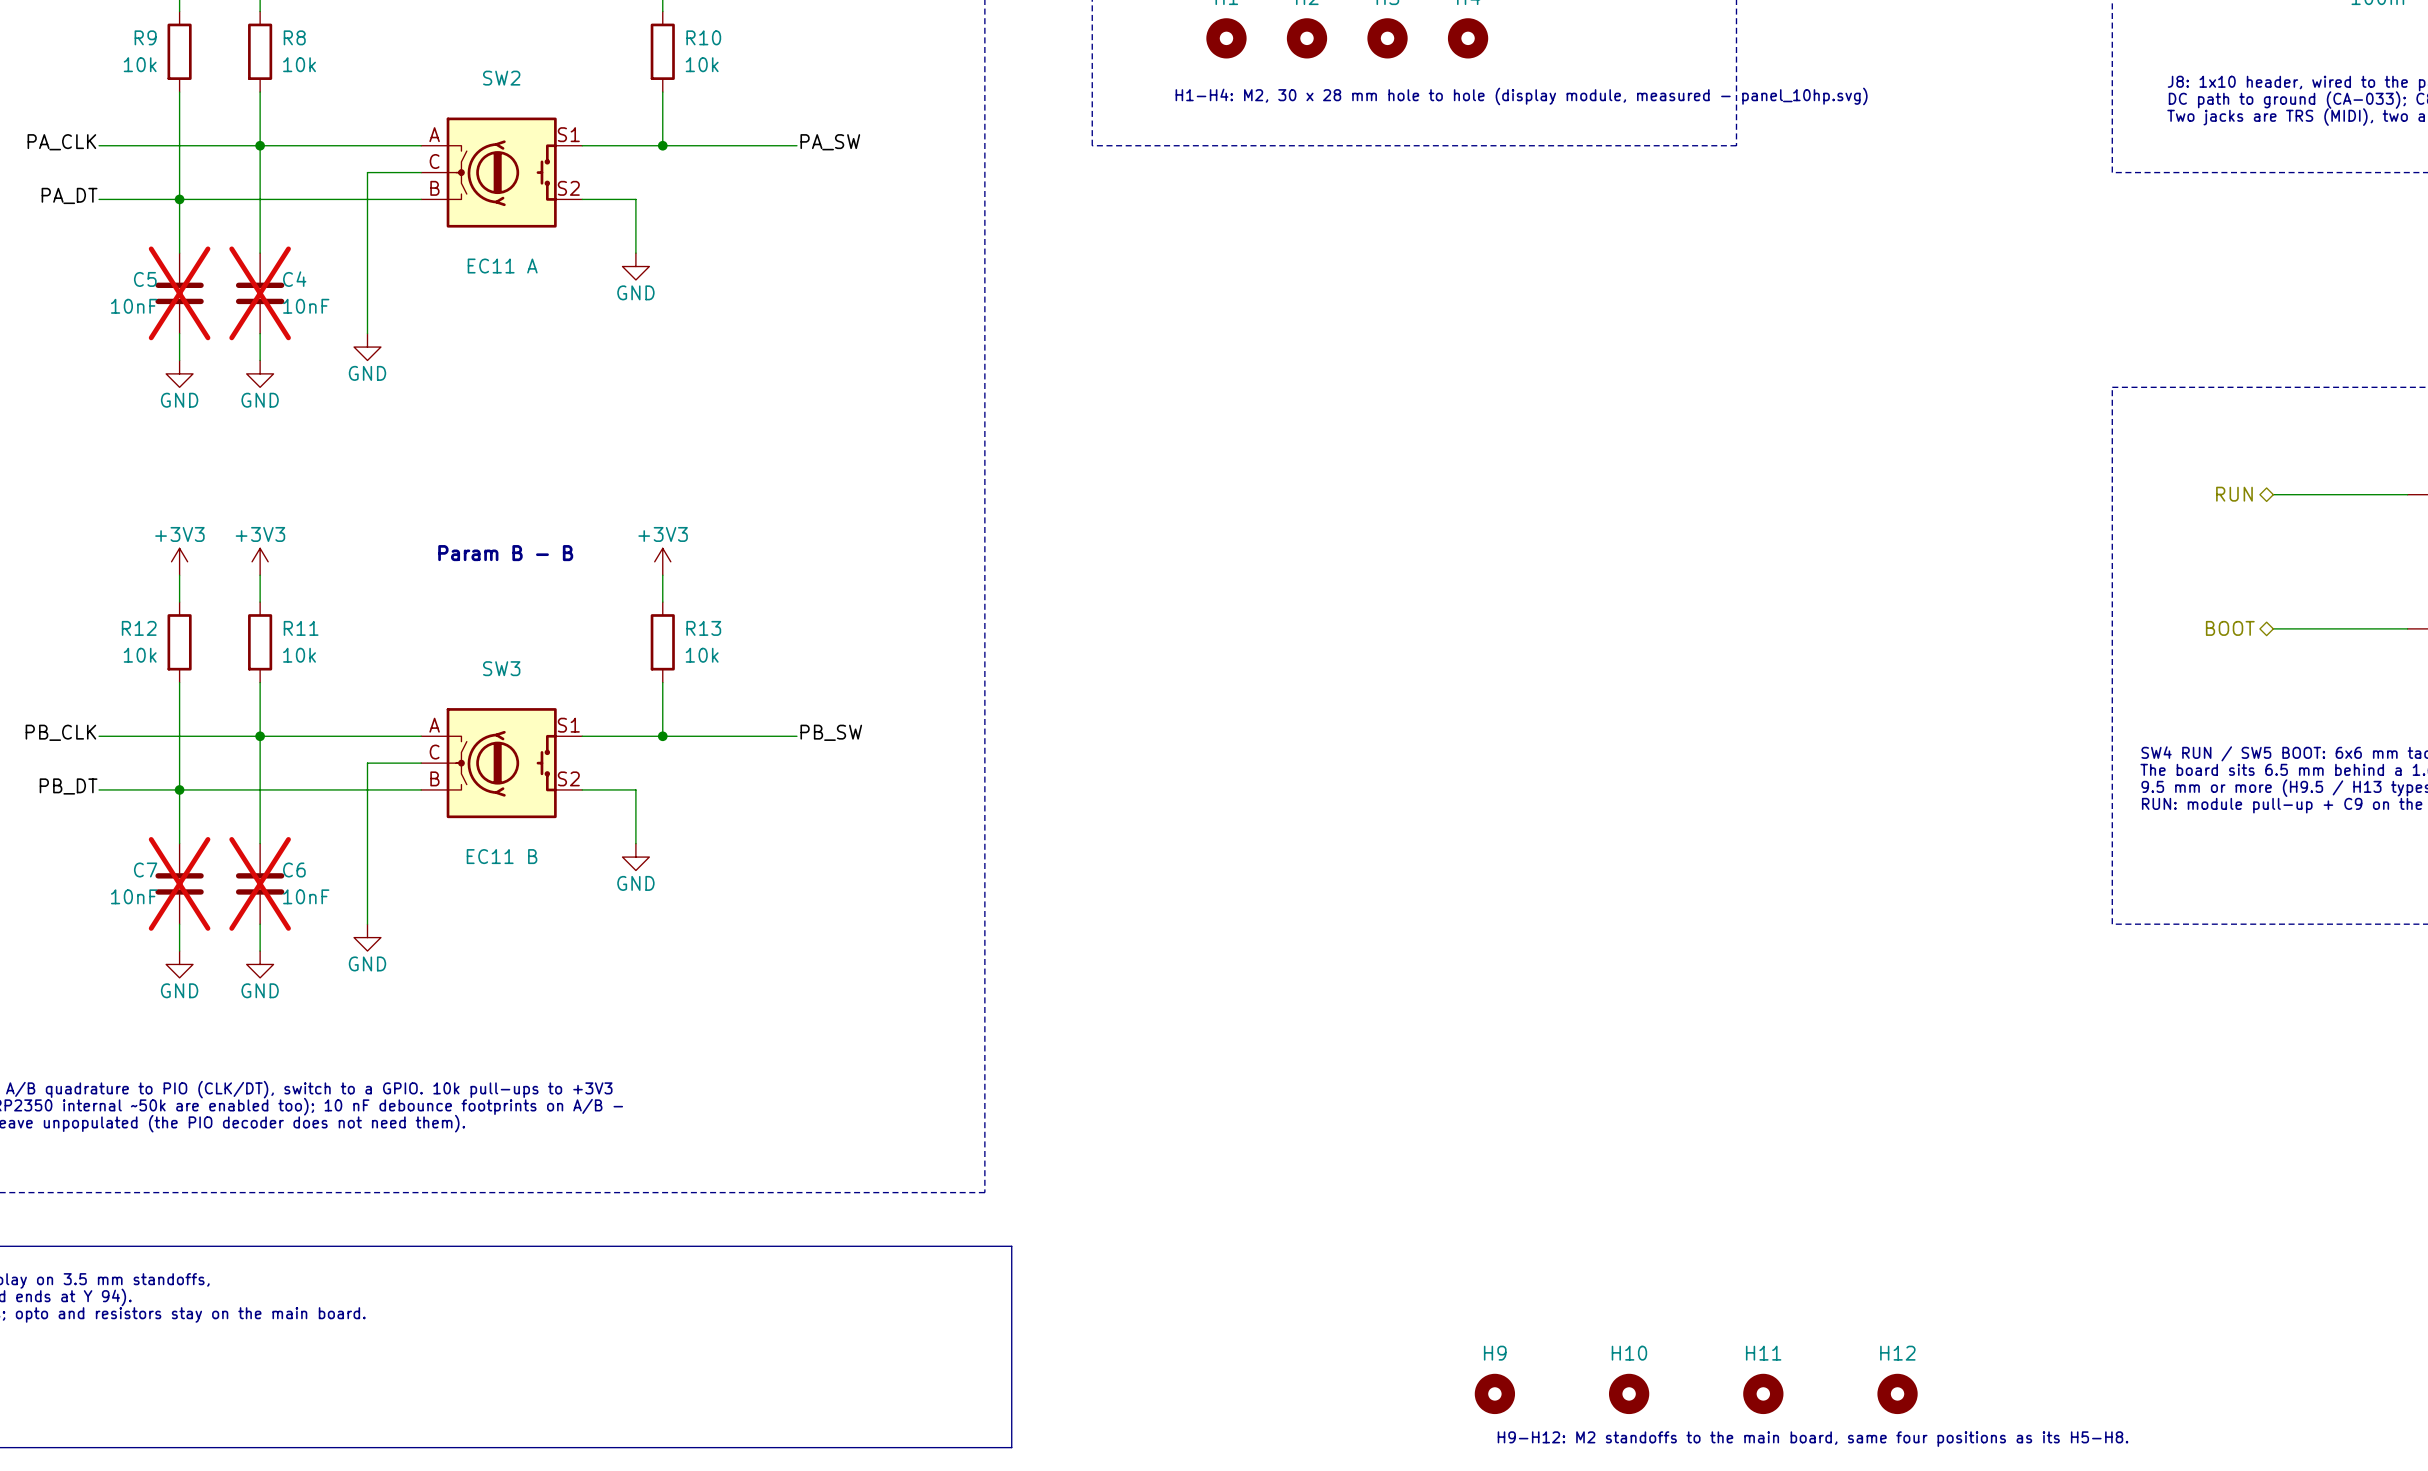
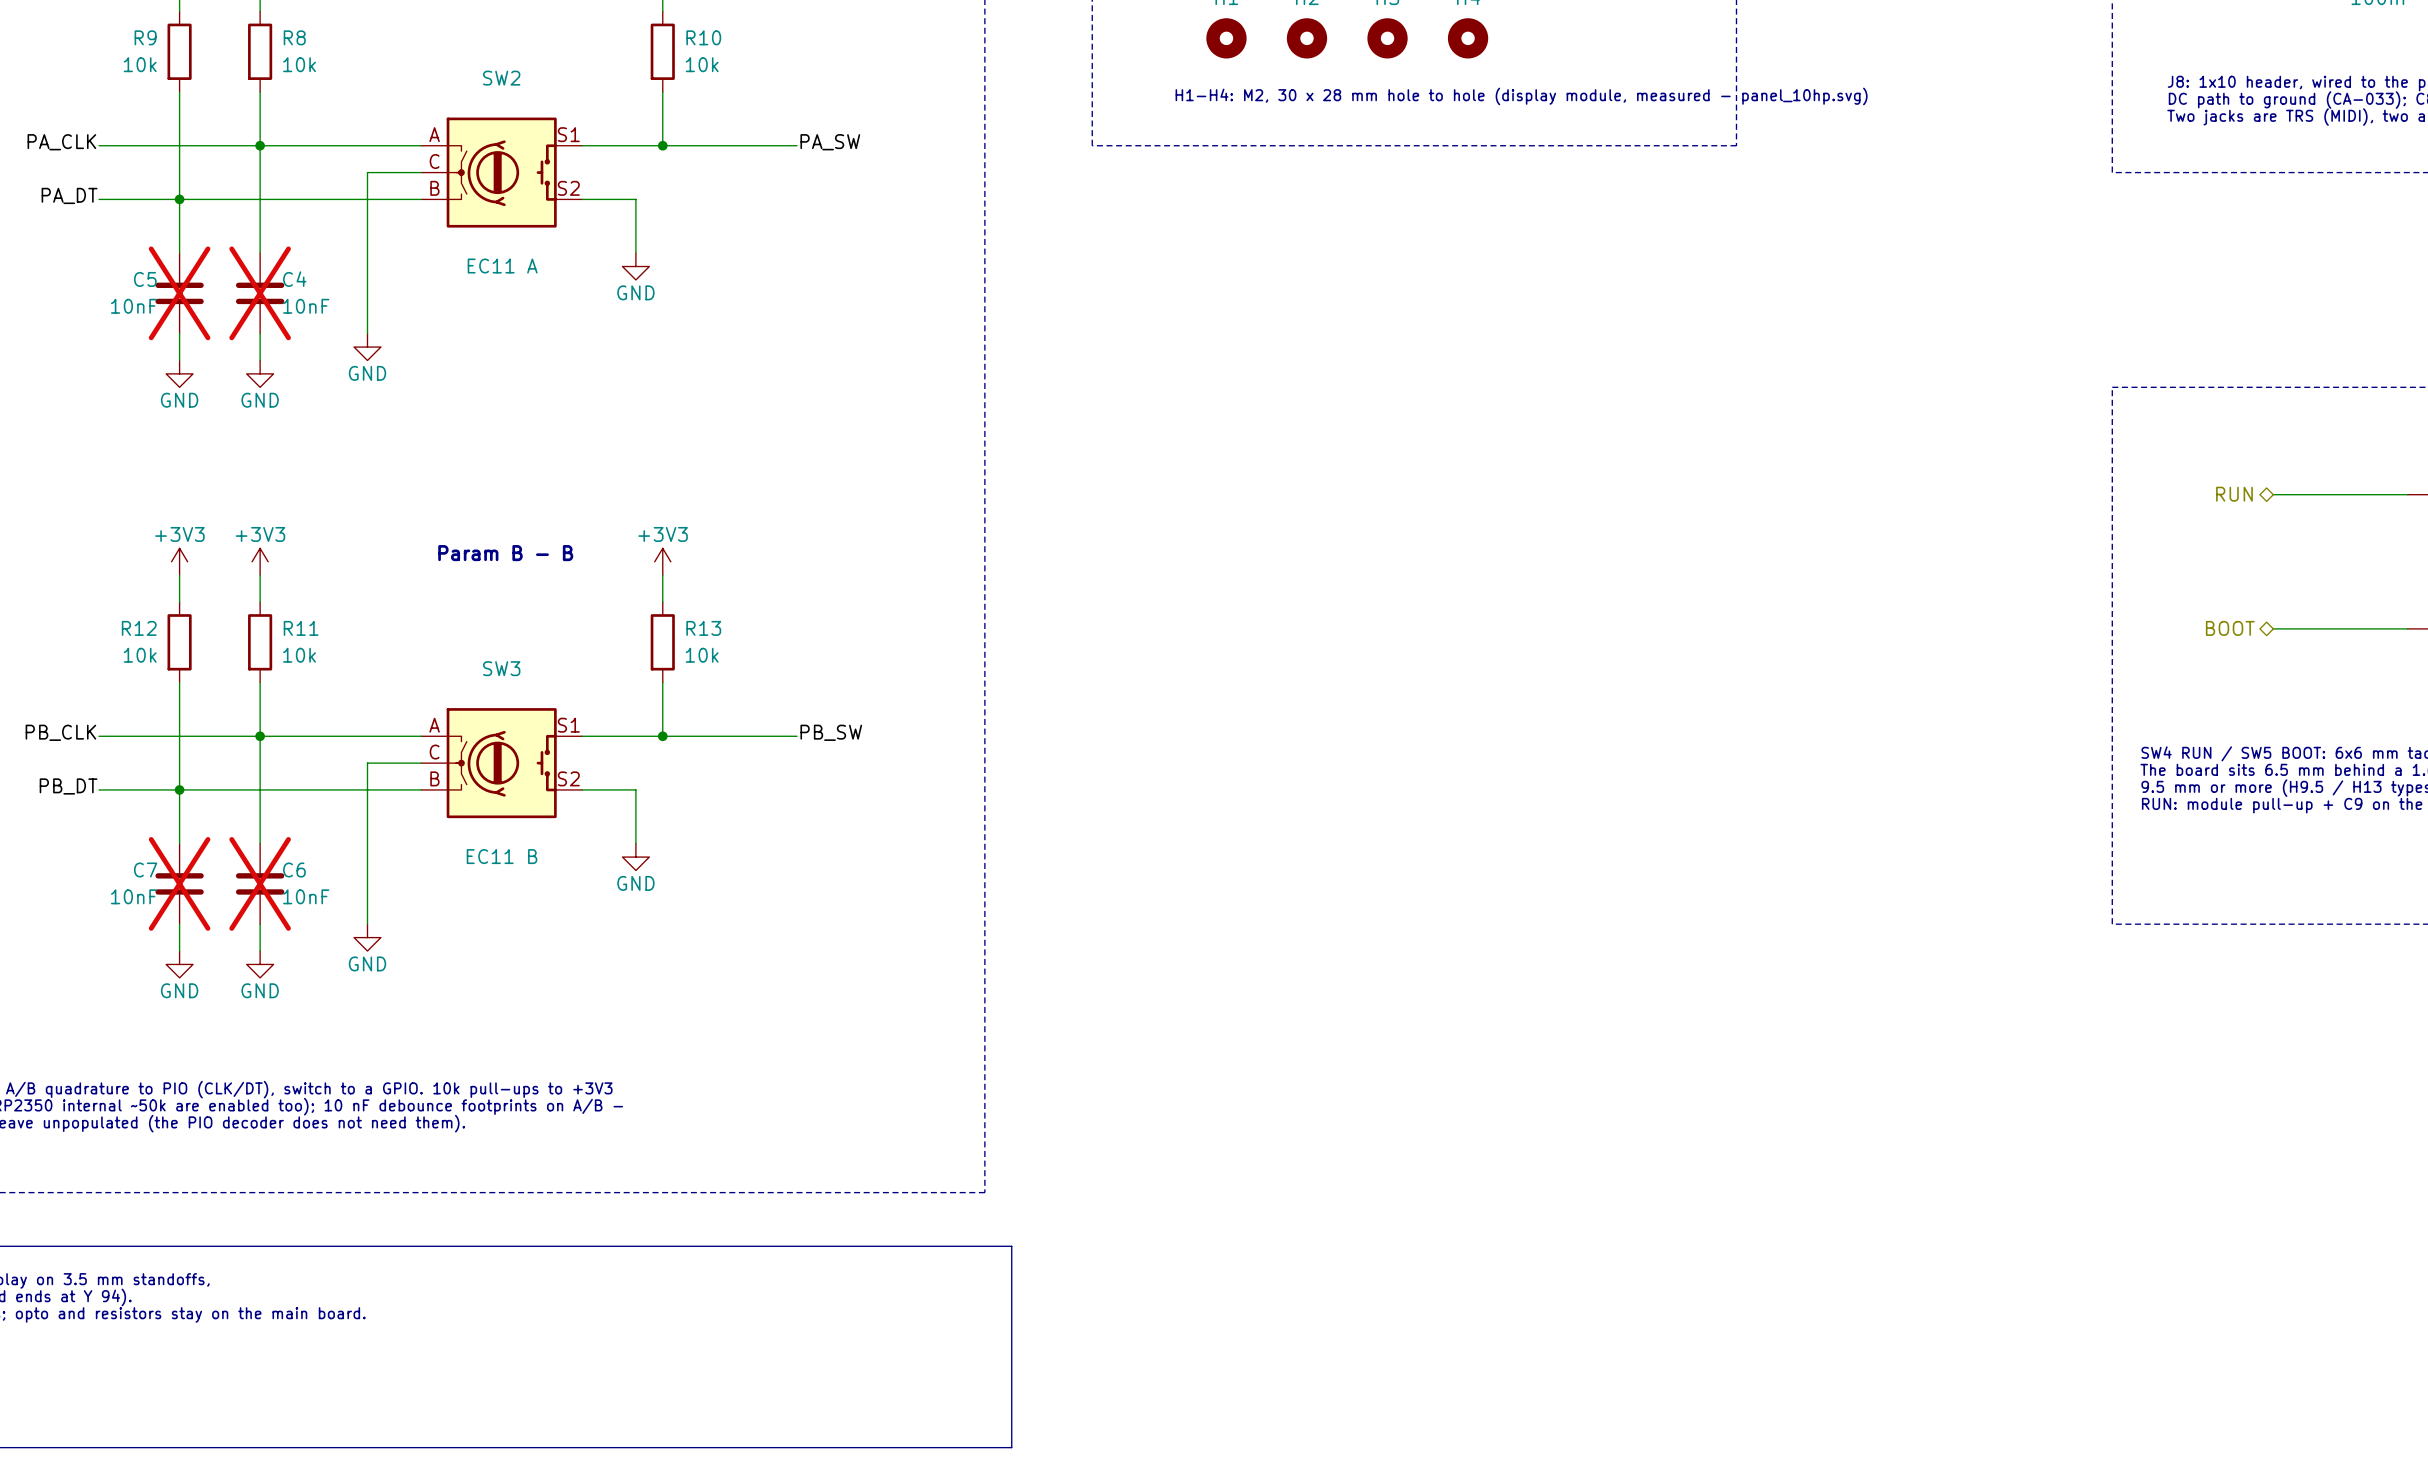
H9: (1494, 1393) -> none
H10: (1629, 1393) -> none
H11: (1763, 1393) -> none
H12: (1897, 1393) -> none
text: H9-H12: M2 standoffs to the main board, same four positions as its H5-H8. (1813, 1439) -> none

